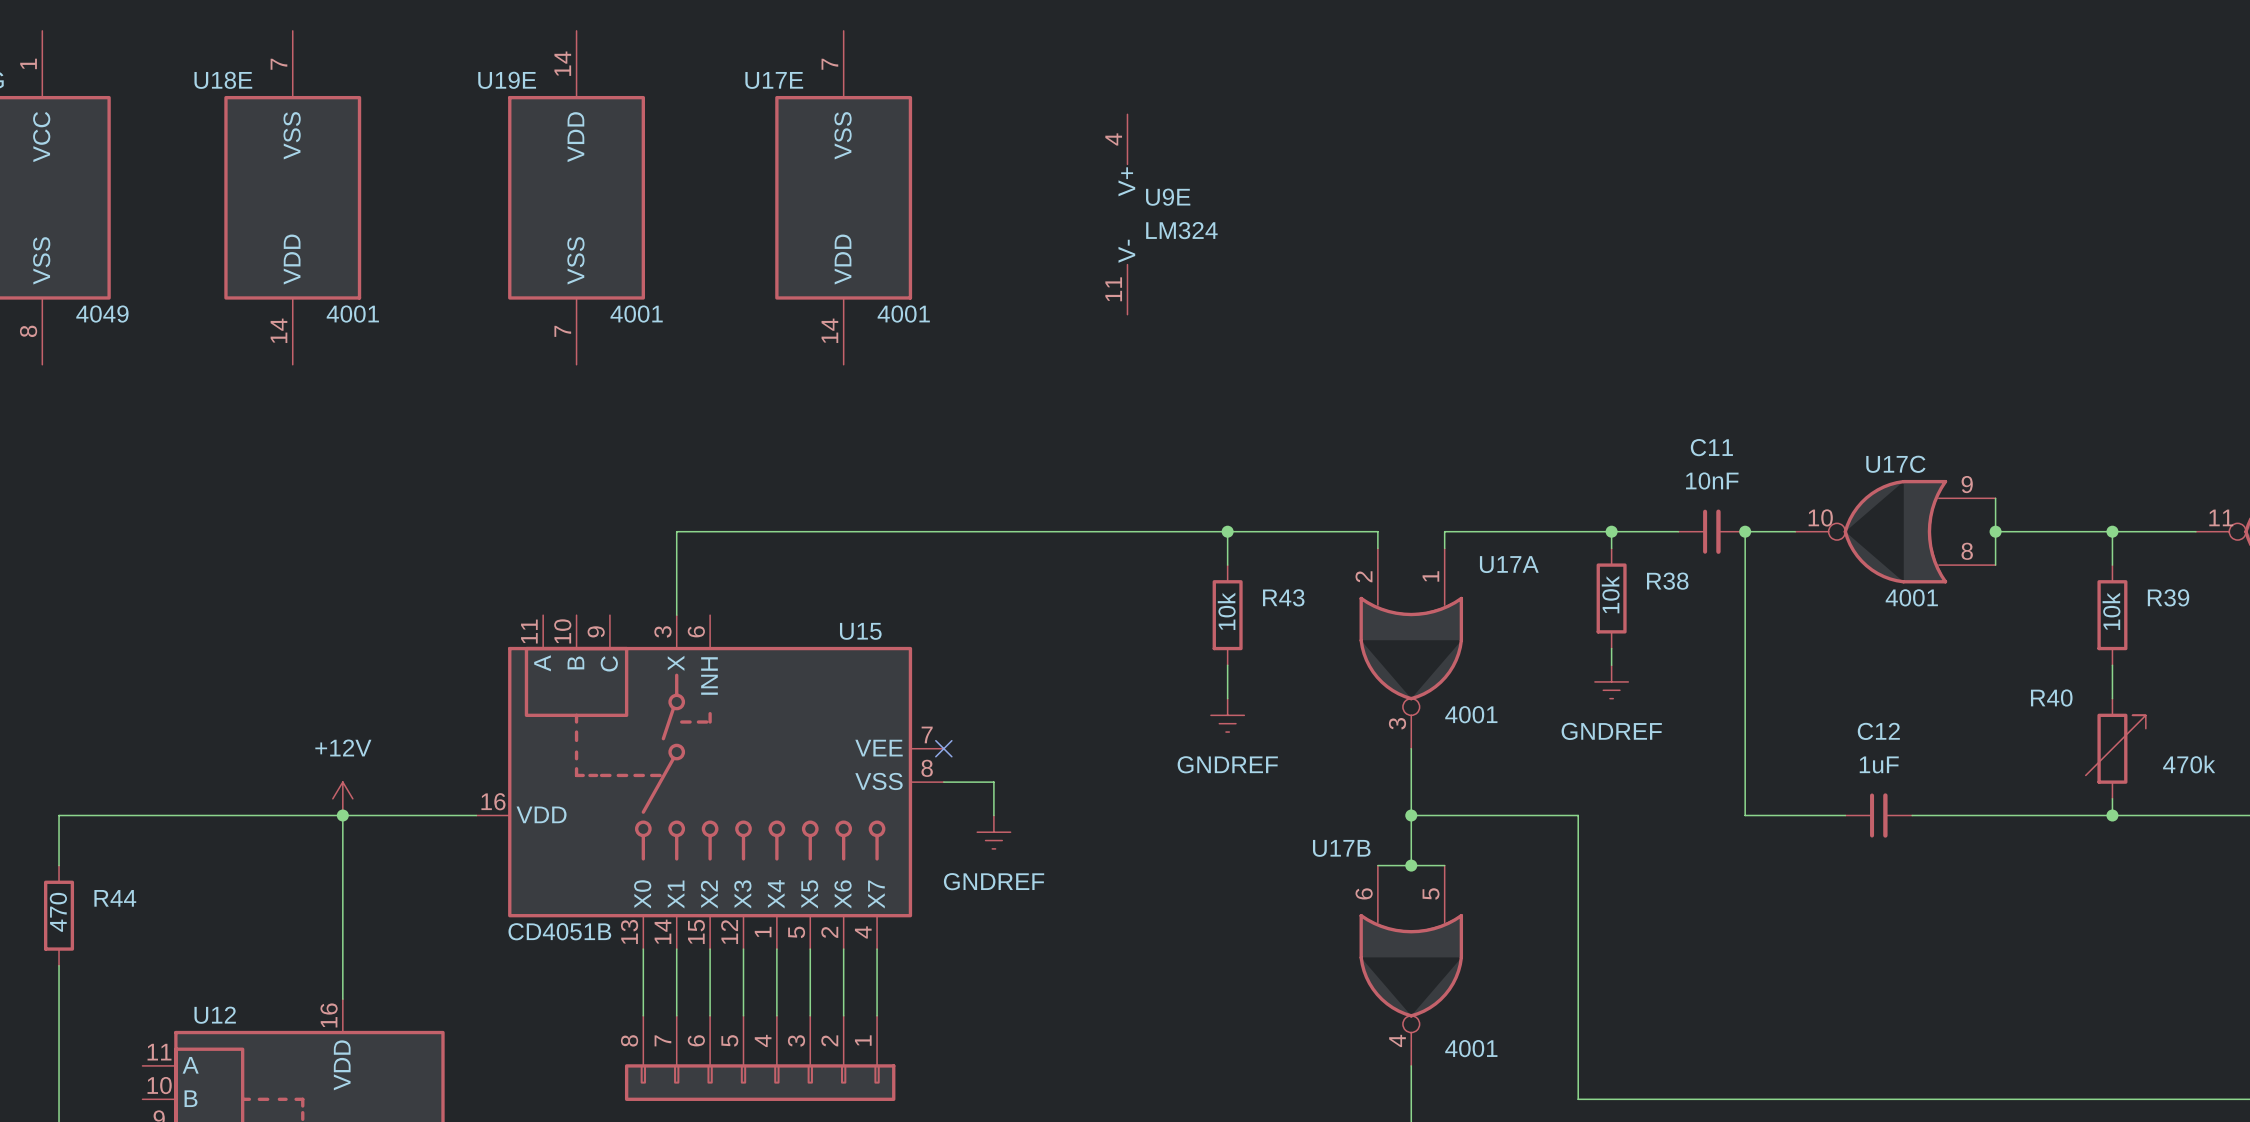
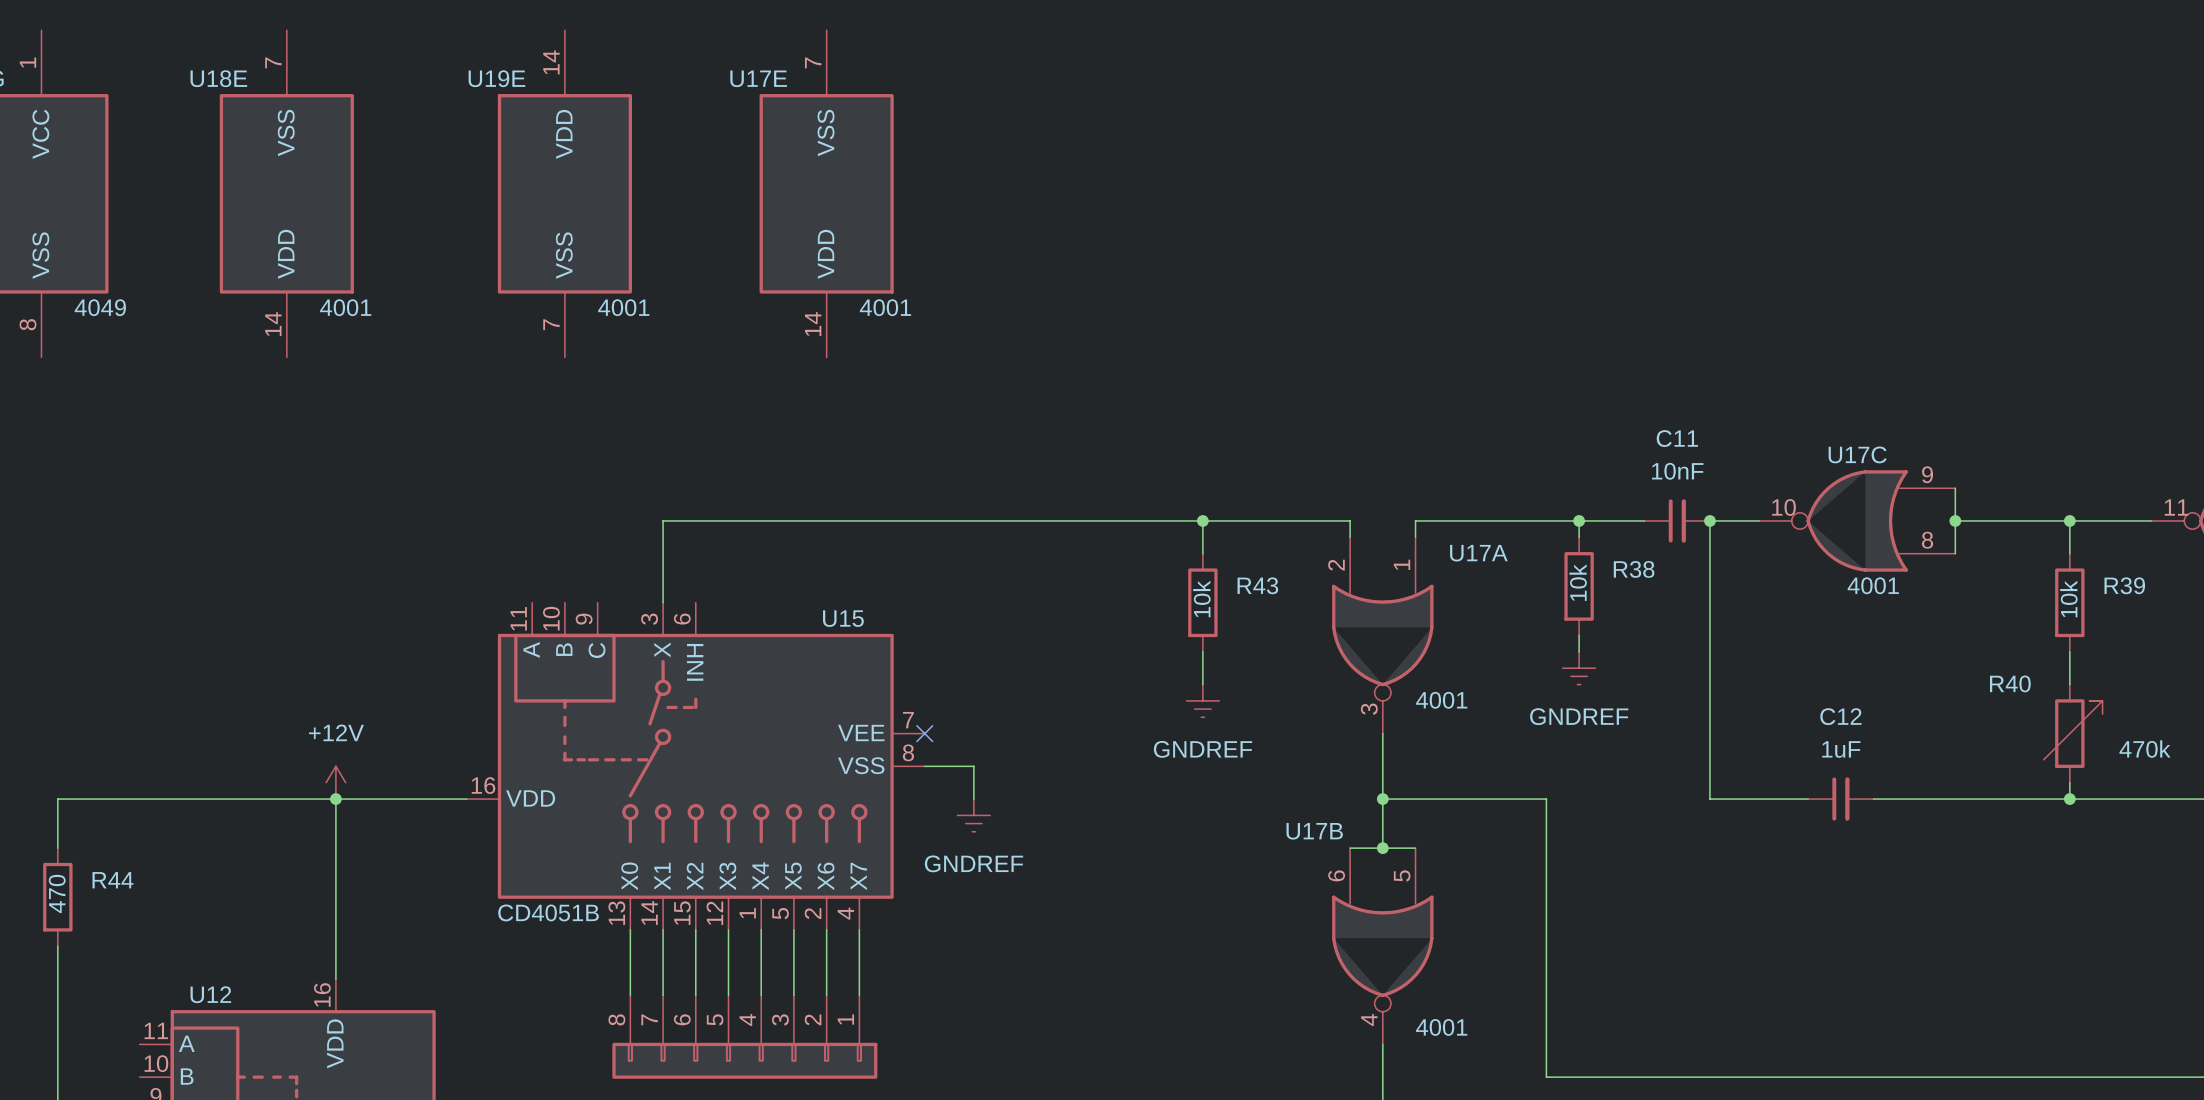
U9E: LM324 (1127, 214) -> none

